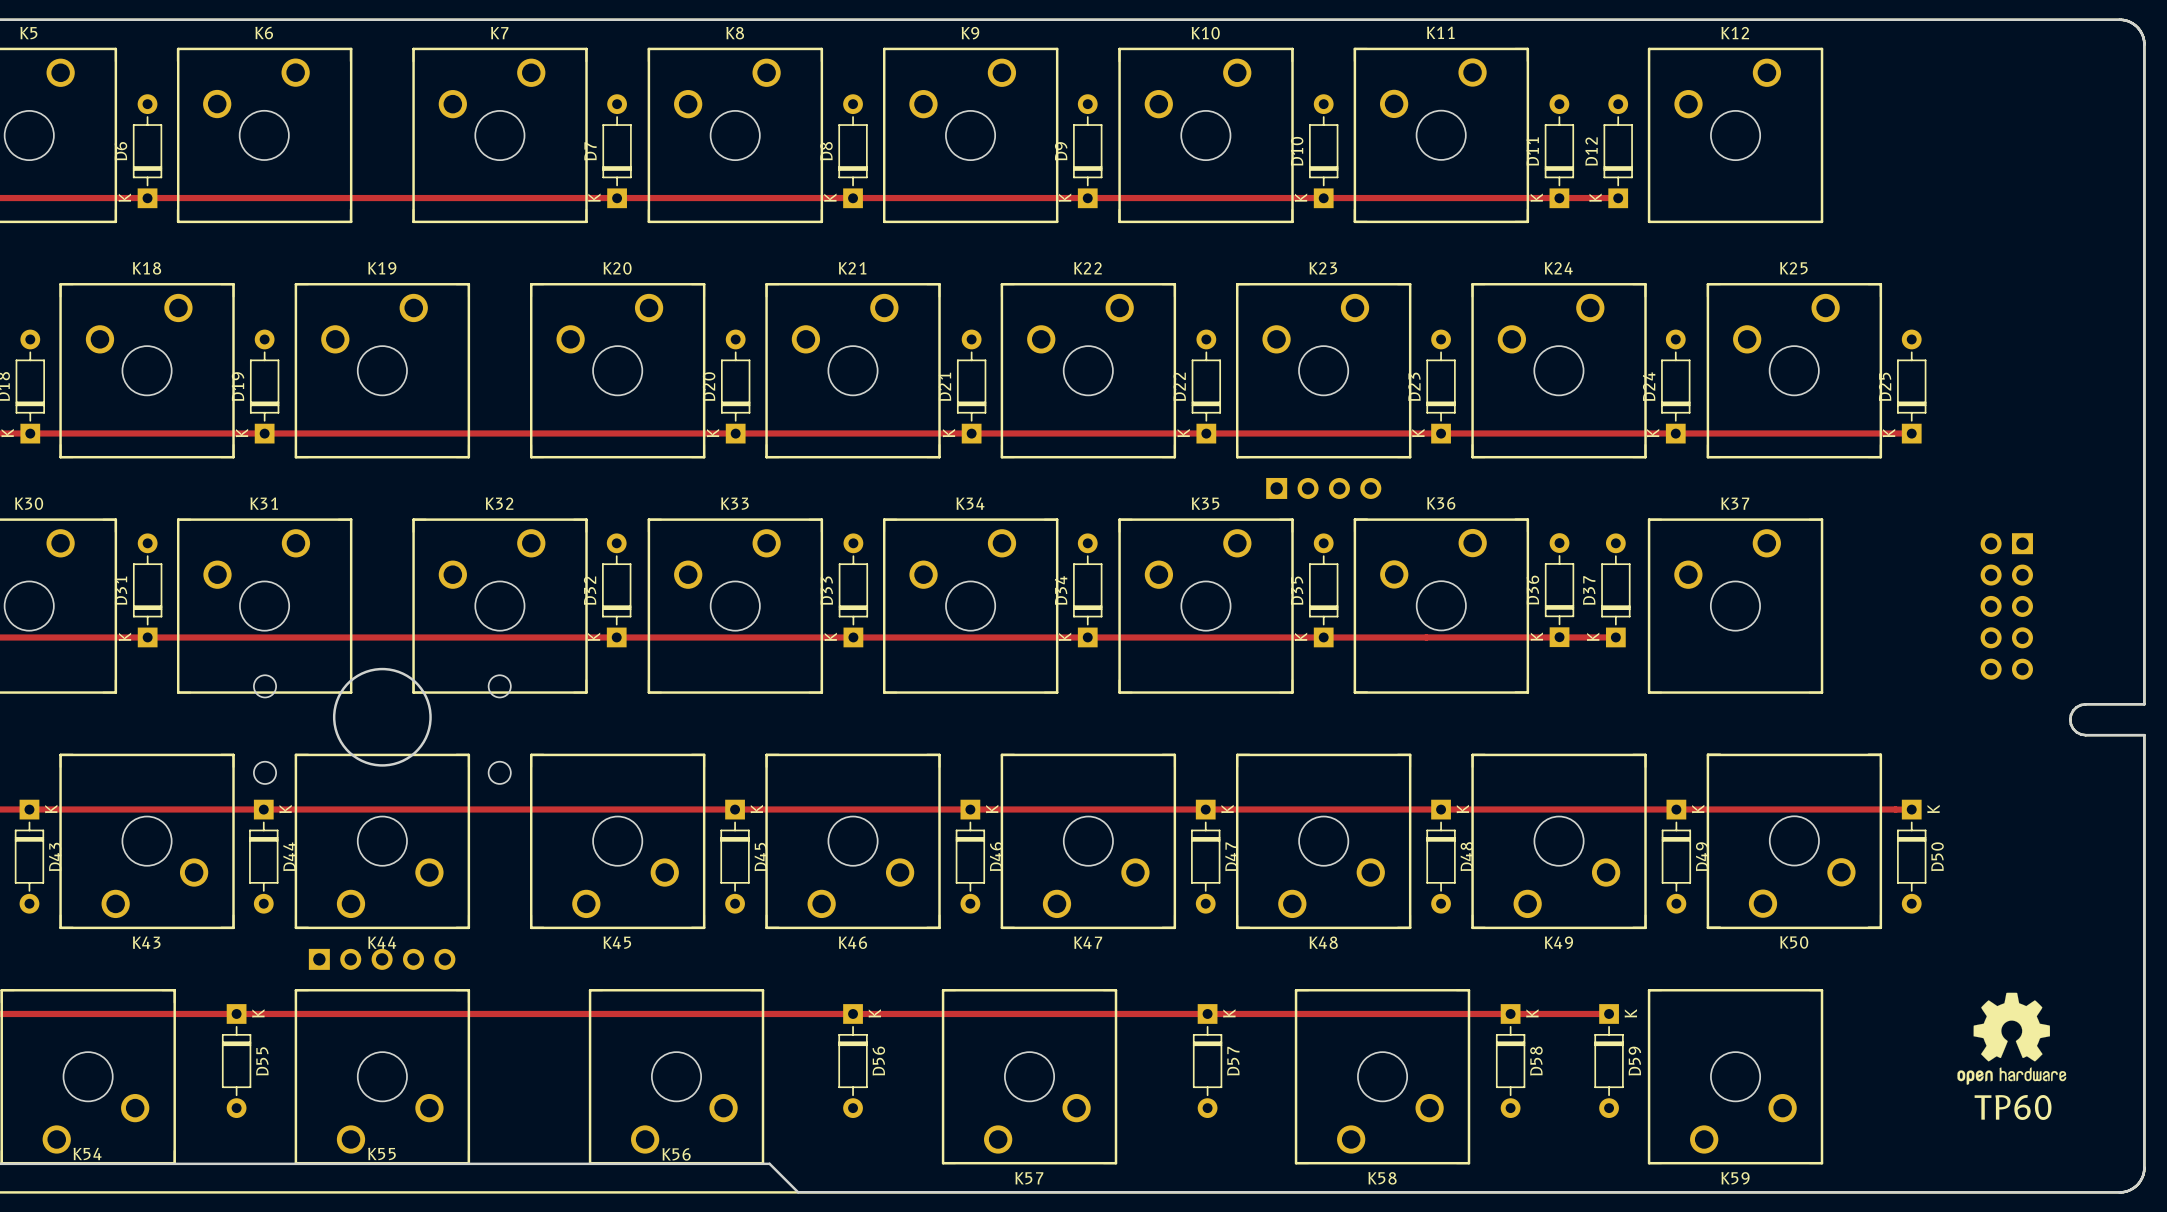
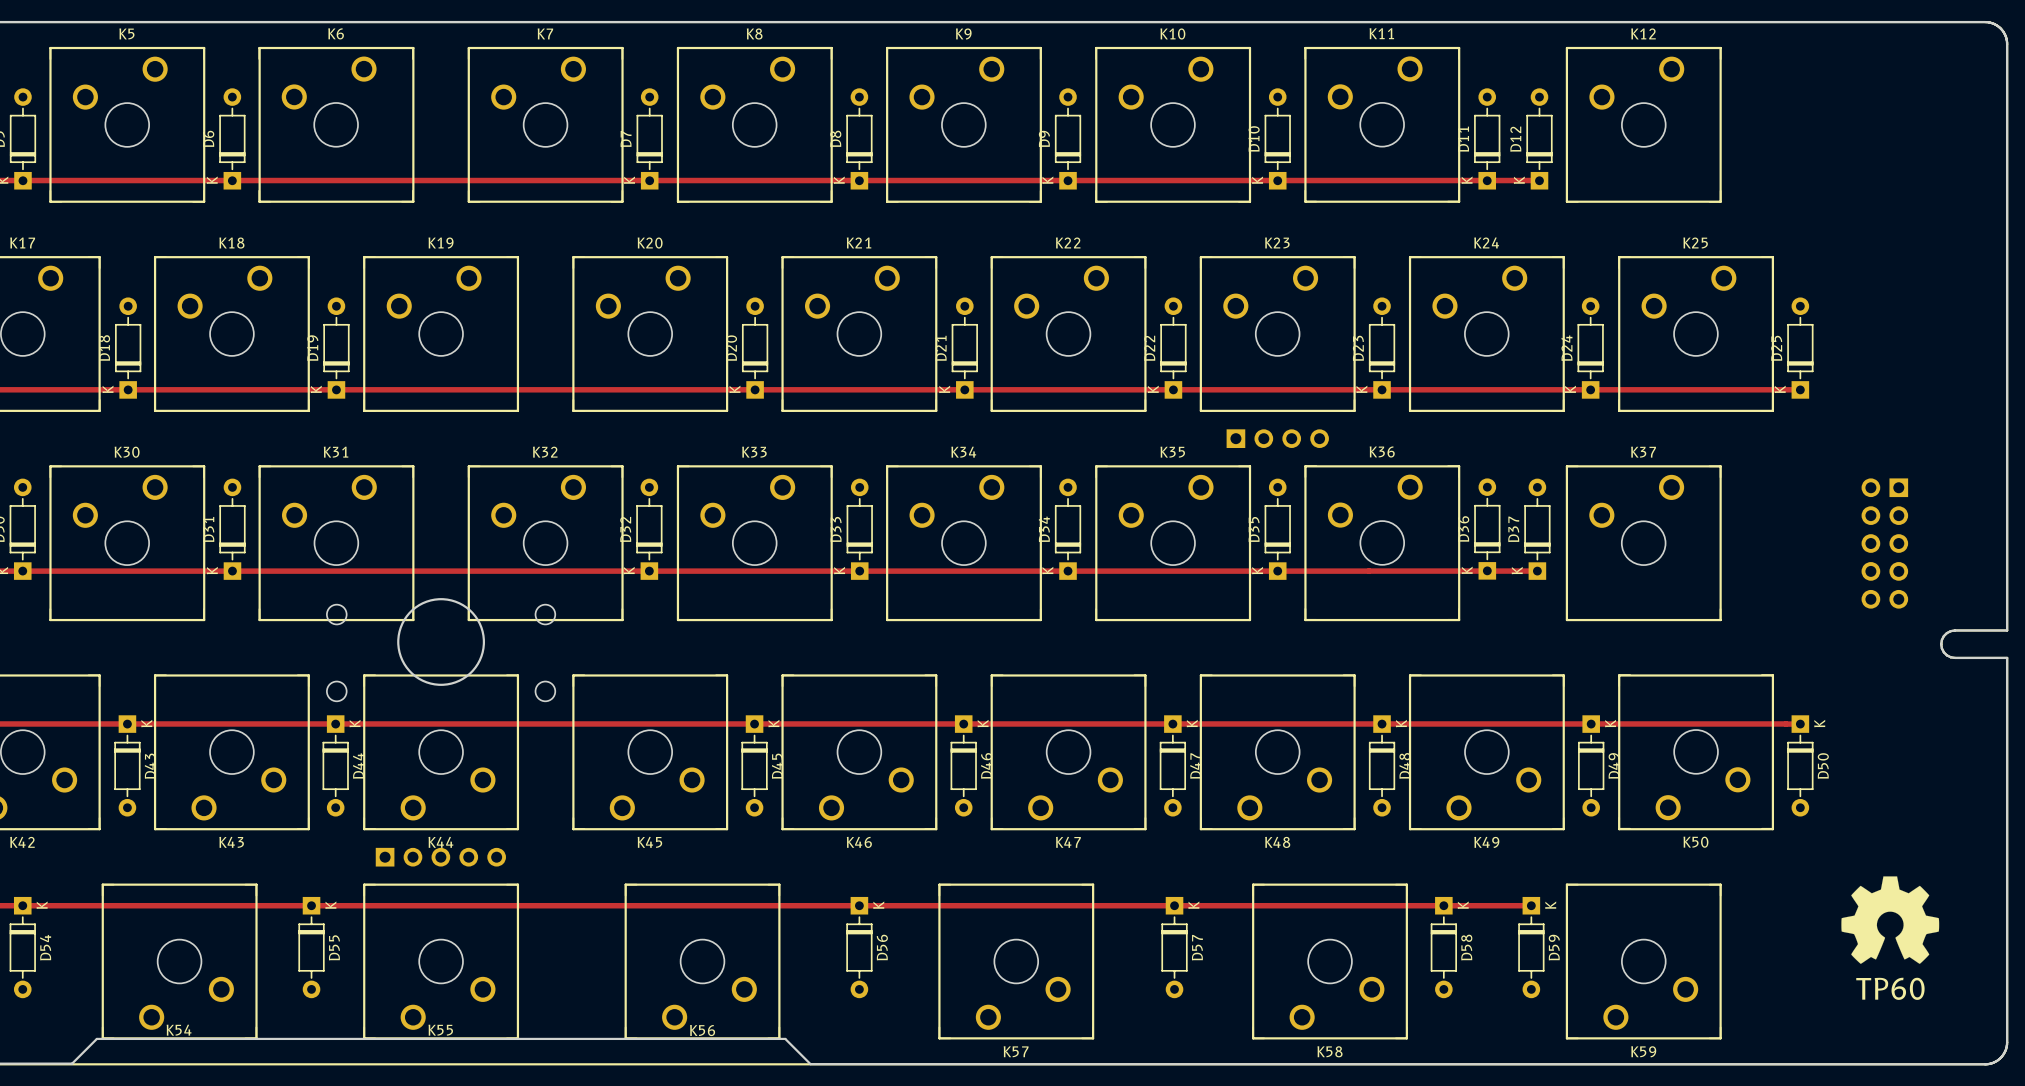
drawing shape: [1957, 992, 2067, 1085] -> [1841, 876, 1940, 964]

